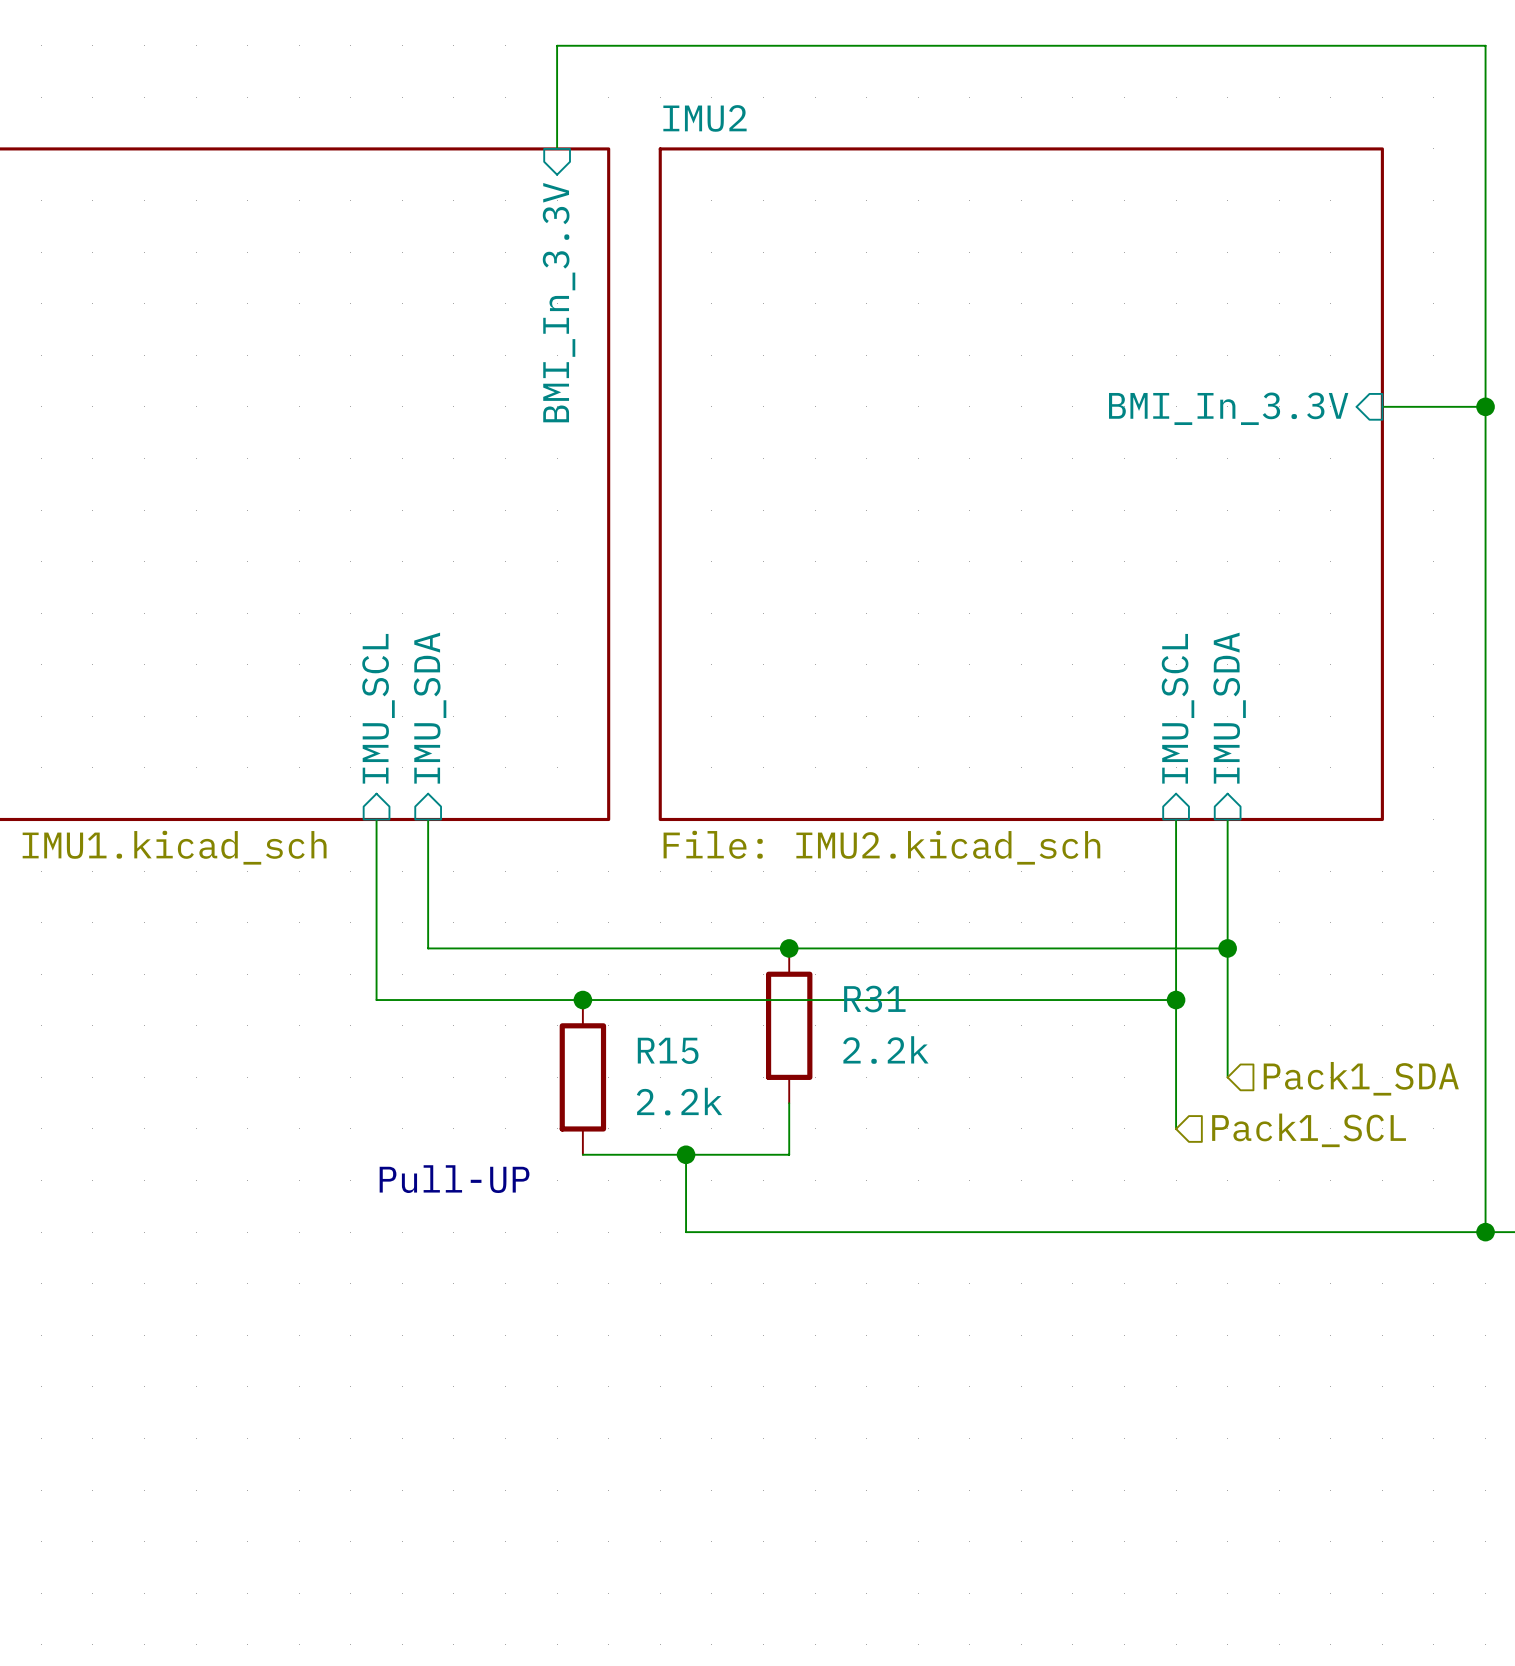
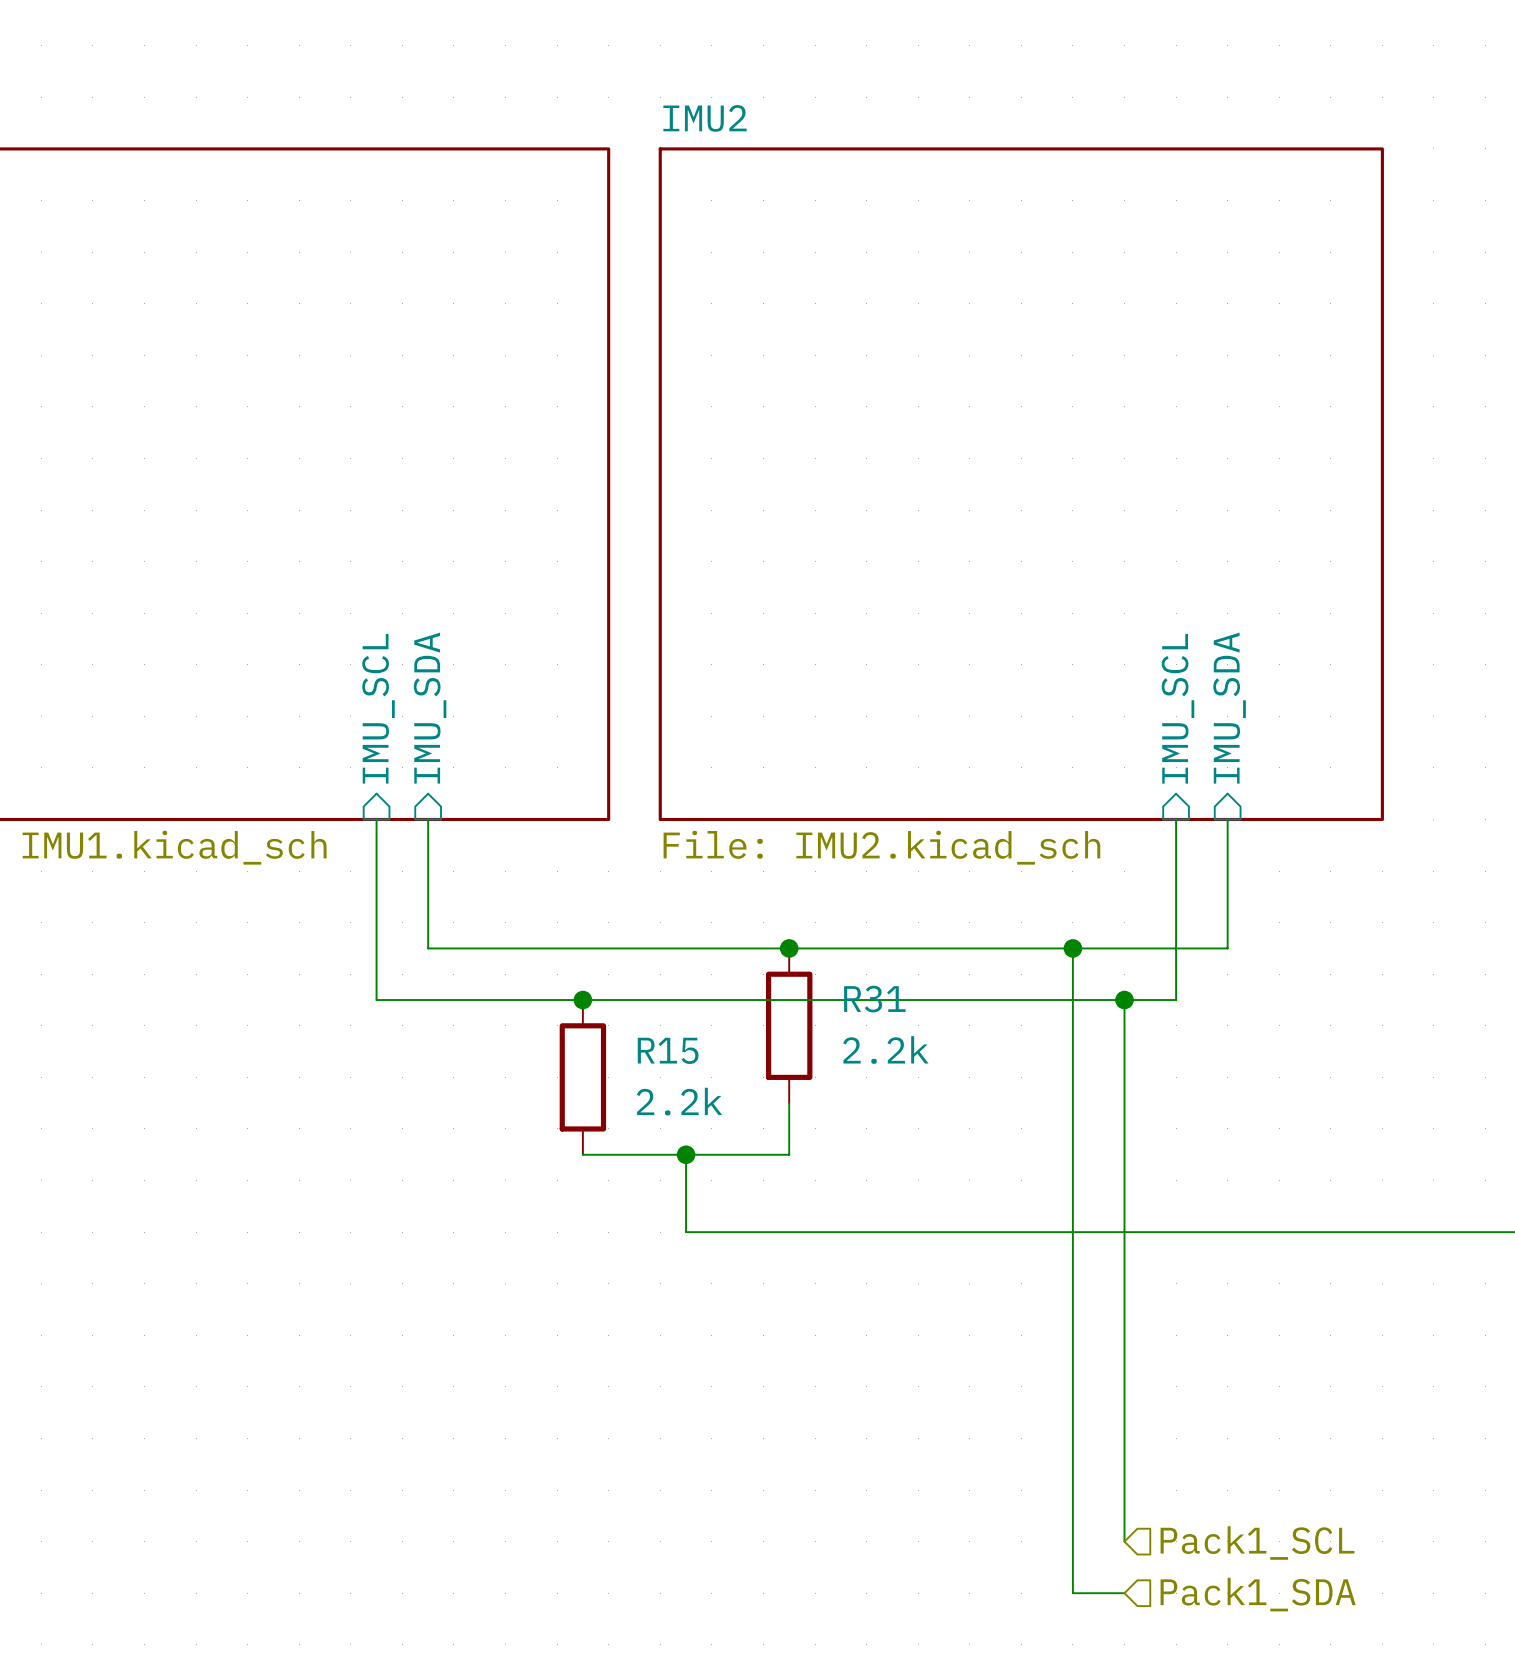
wire: (557, 148) (557, 45) (1485, 45) (1485, 1232) -> none
sheet pin: BMI_In_3.3V (559, 302) -> none
wire: (1382, 406) (1485, 406) -> none
junction: (1485, 406) -> none
sheet pin: BMI_In_3.3V (1228, 408) -> none
wire: none -> (1072, 948) (1072, 1593) (1124, 1593)
junction: none -> (1072, 948)
wire: (1227, 948) (1227, 1077) -> none
junction: (1227, 948) -> none
wire: none -> (1124, 1000) (1124, 1541)
wire: (1176, 1000) (1176, 1128) -> none
junction position: (1176, 1000) -> (1124, 1000)
hierarchical label: Pack1_SDA (1361, 1078) -> none
hierarchical label position: Pack1_SCL (1309, 1130) -> Pack1_SCL (1257, 1543)
text: Pull-UP (454, 1179) -> none
junction: (1485, 1232) -> none
hierarchical label: none -> Pack1_SDA (1258, 1594)

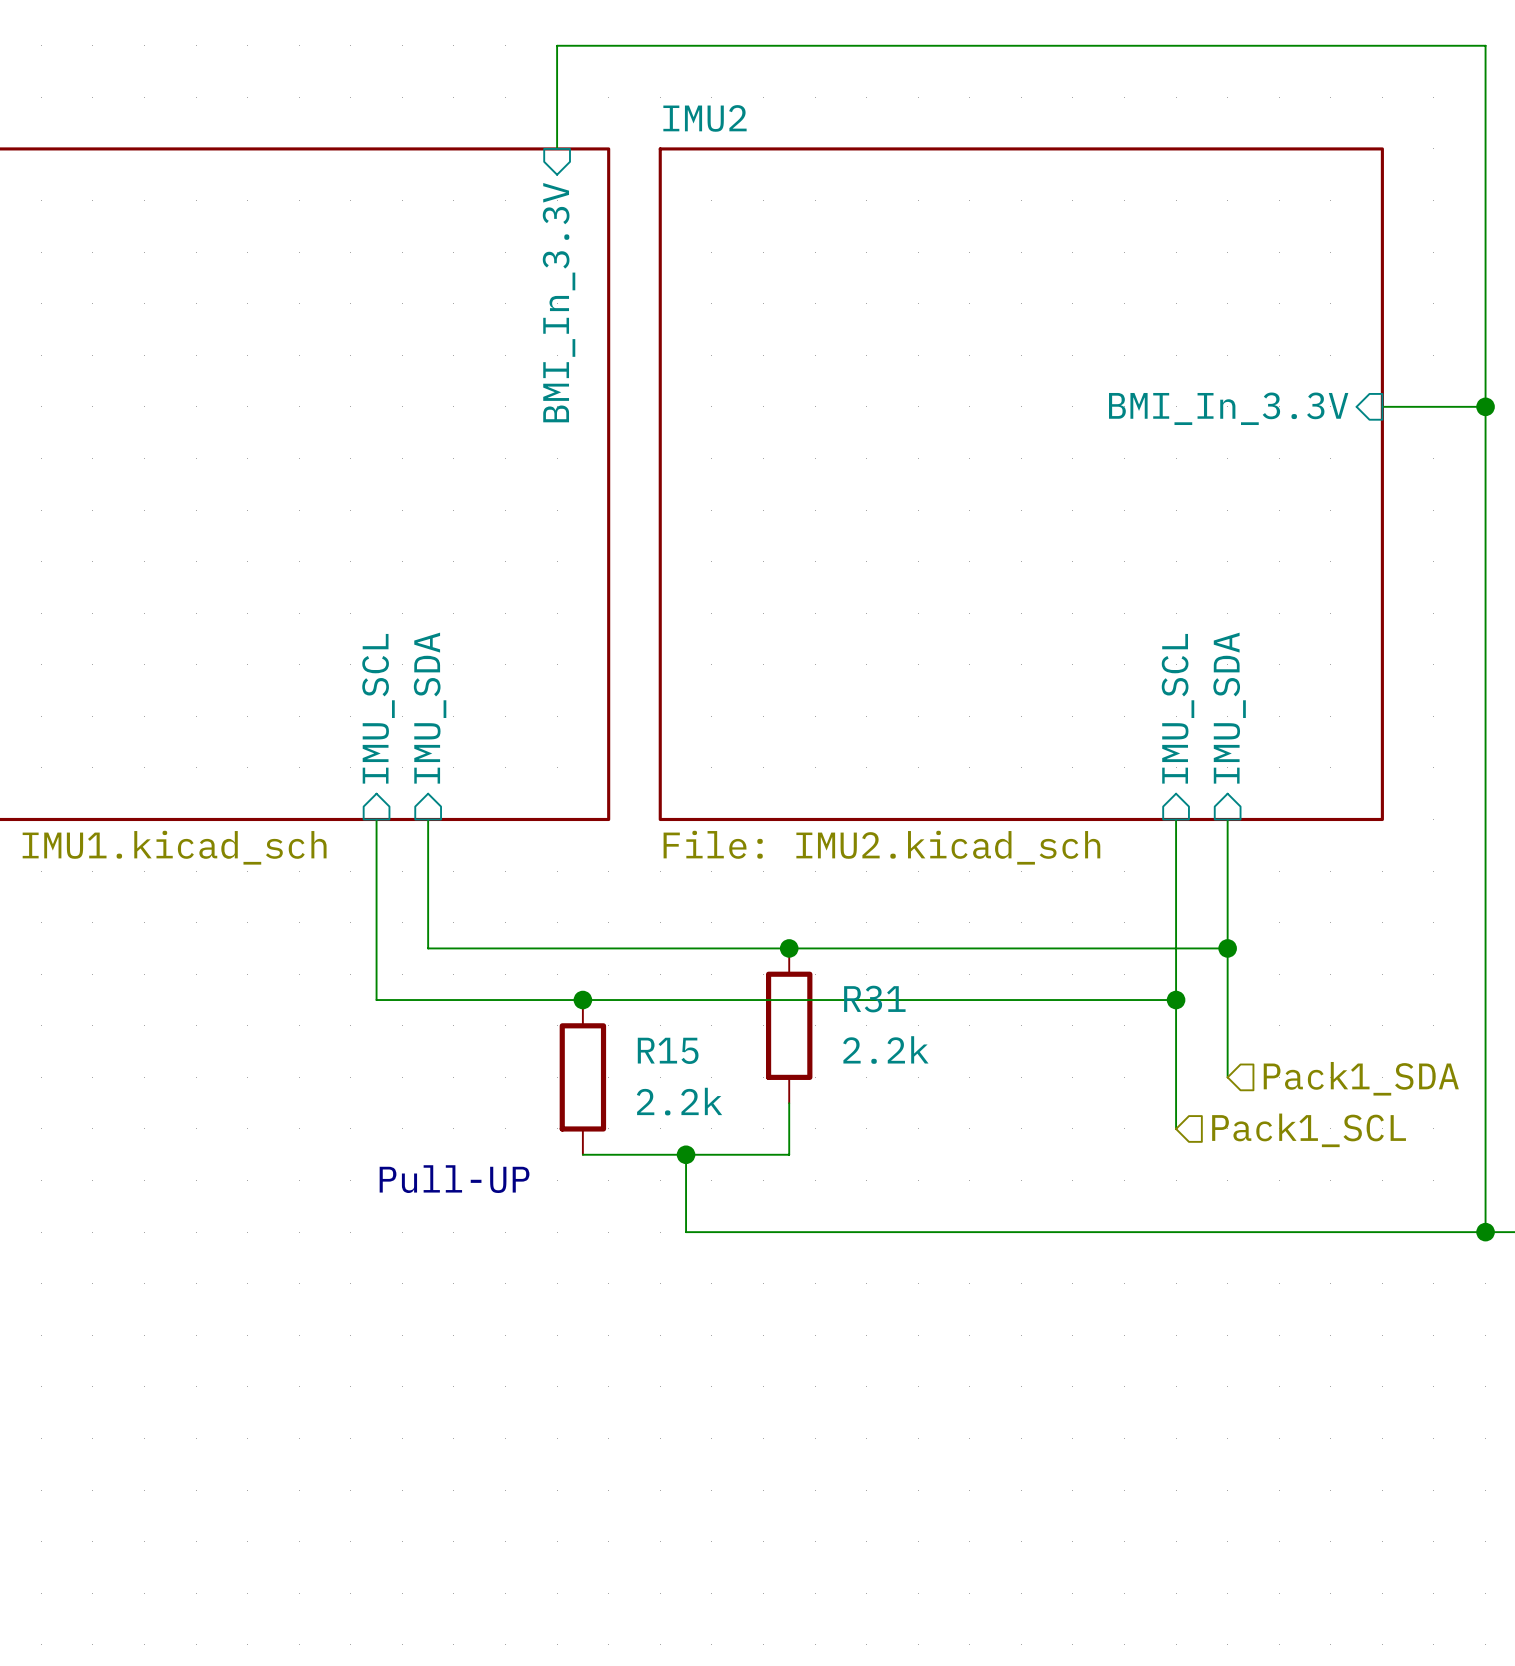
wire: none -> (557, 148) (557, 45) (1485, 45) (1485, 1232)
sheet pin: none -> BMI_In_3.3V (559, 302)
wire: none -> (1382, 406) (1485, 406)
junction: none -> (1485, 406)
sheet pin: none -> BMI_In_3.3V (1228, 408)
wire: (1072, 948) (1072, 1593) (1124, 1593) -> none
junction: (1072, 948) -> none
wire: none -> (1227, 948) (1227, 1077)
junction: none -> (1227, 948)
wire: (1124, 1000) (1124, 1541) -> none
junction position: (1124, 1000) -> (1176, 1000)
wire: none -> (1176, 1000) (1176, 1128)
hierarchical label: none -> Pack1_SDA (1361, 1078)
text: none -> Pull-UP (454, 1179)
junction: none -> (1485, 1232)
hierarchical label position: Pack1_SCL (1257, 1543) -> Pack1_SCL (1309, 1130)
hierarchical label: Pack1_SDA (1258, 1594) -> none

